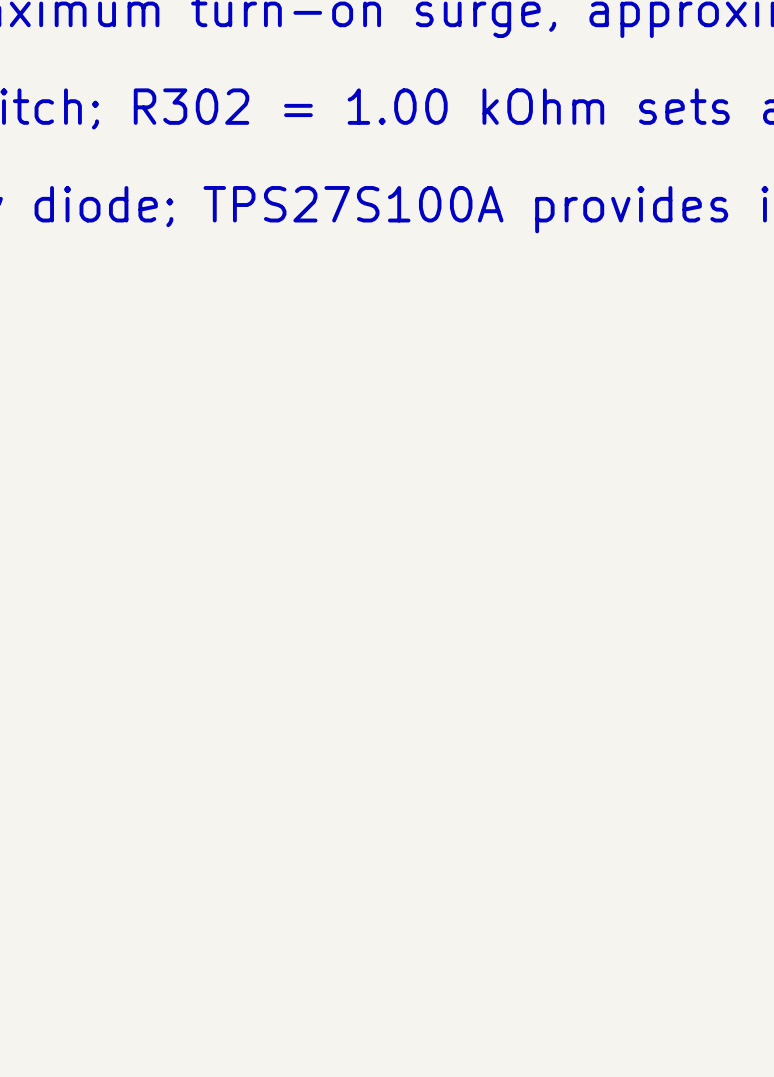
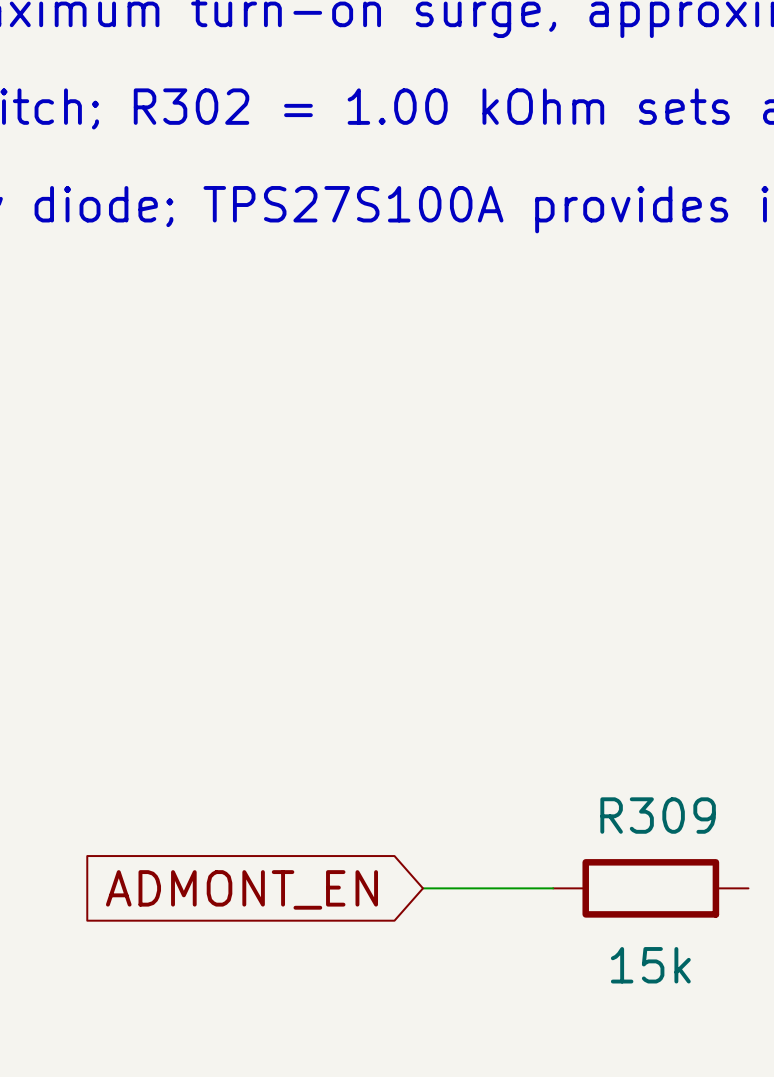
wire: none -> (422, 888) (553, 888)
R309: none -> 15k (650, 888)
global label: none -> ADMONT_EN (241, 889)

